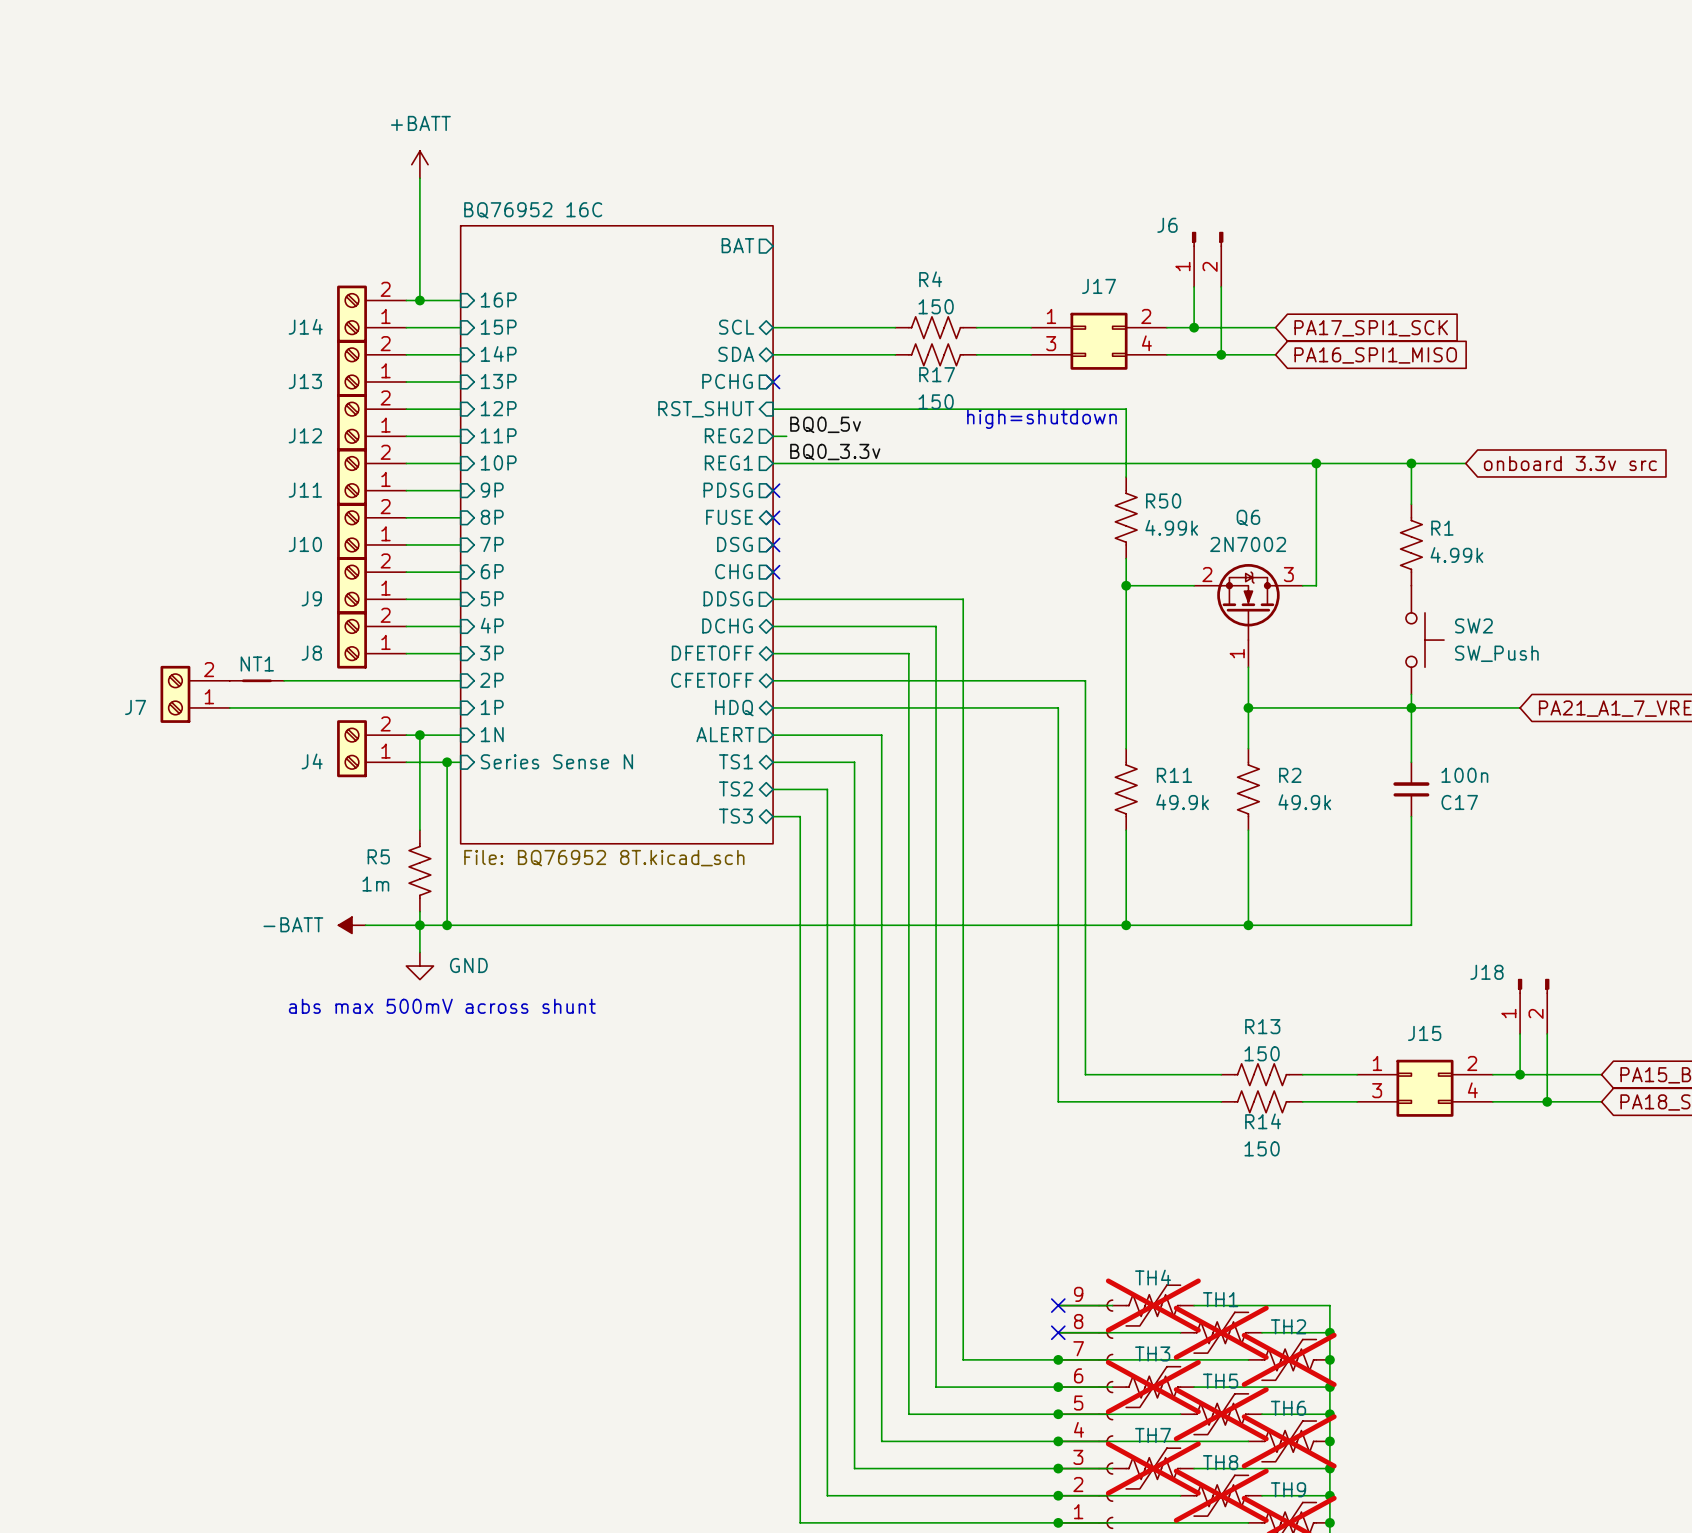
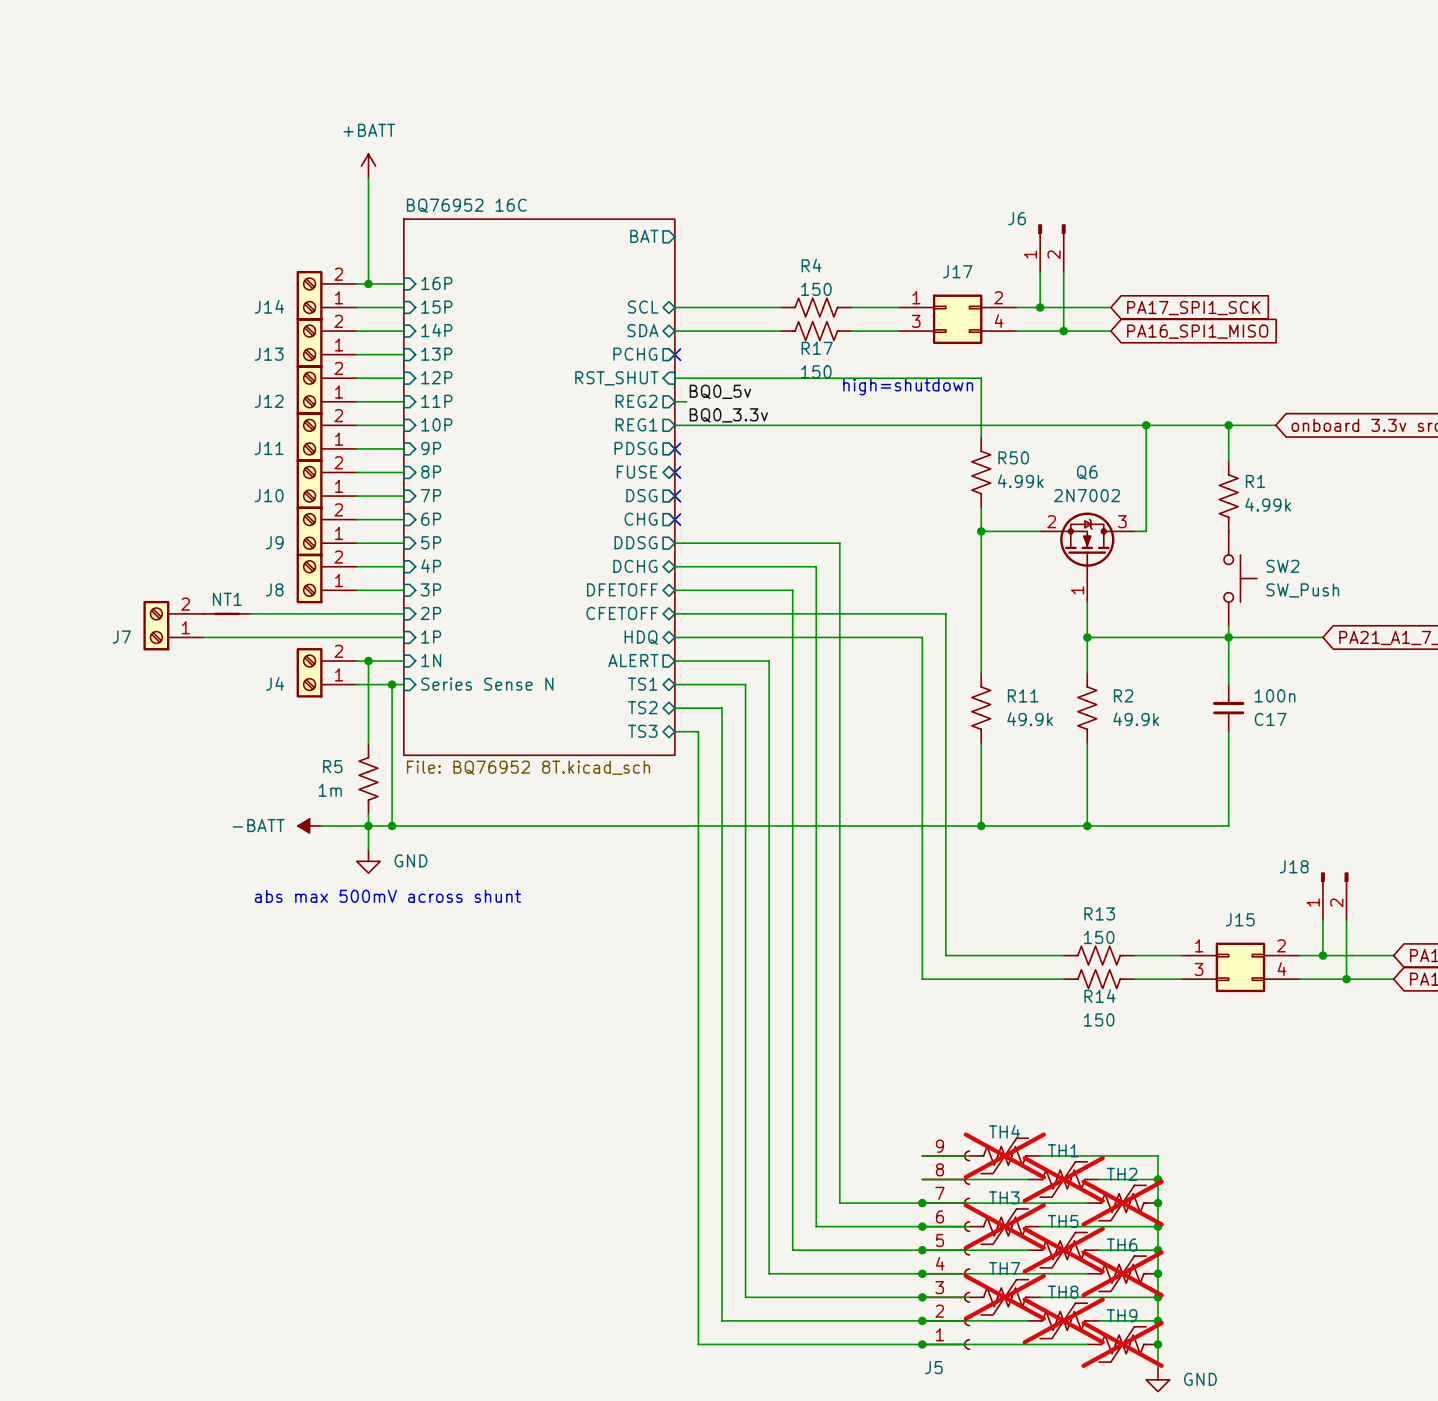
no-connect mark: (1058, 1305) -> none
no-connect mark: (1058, 1332) -> none

